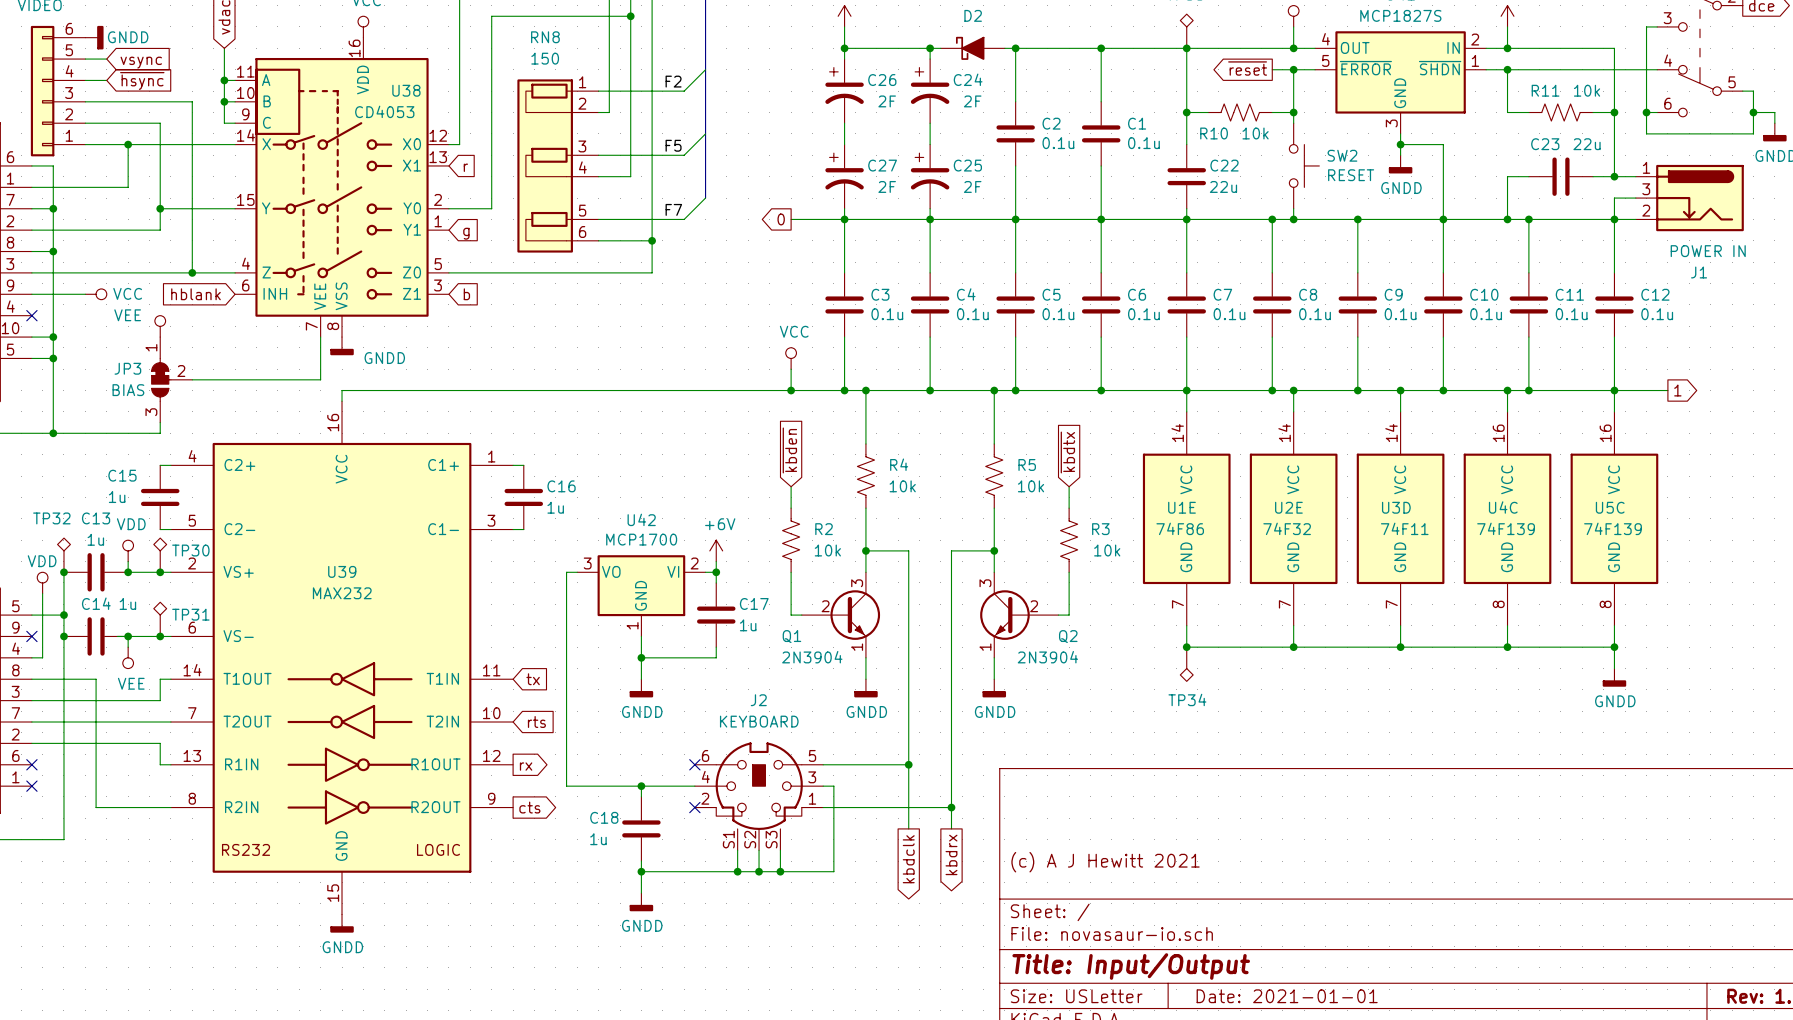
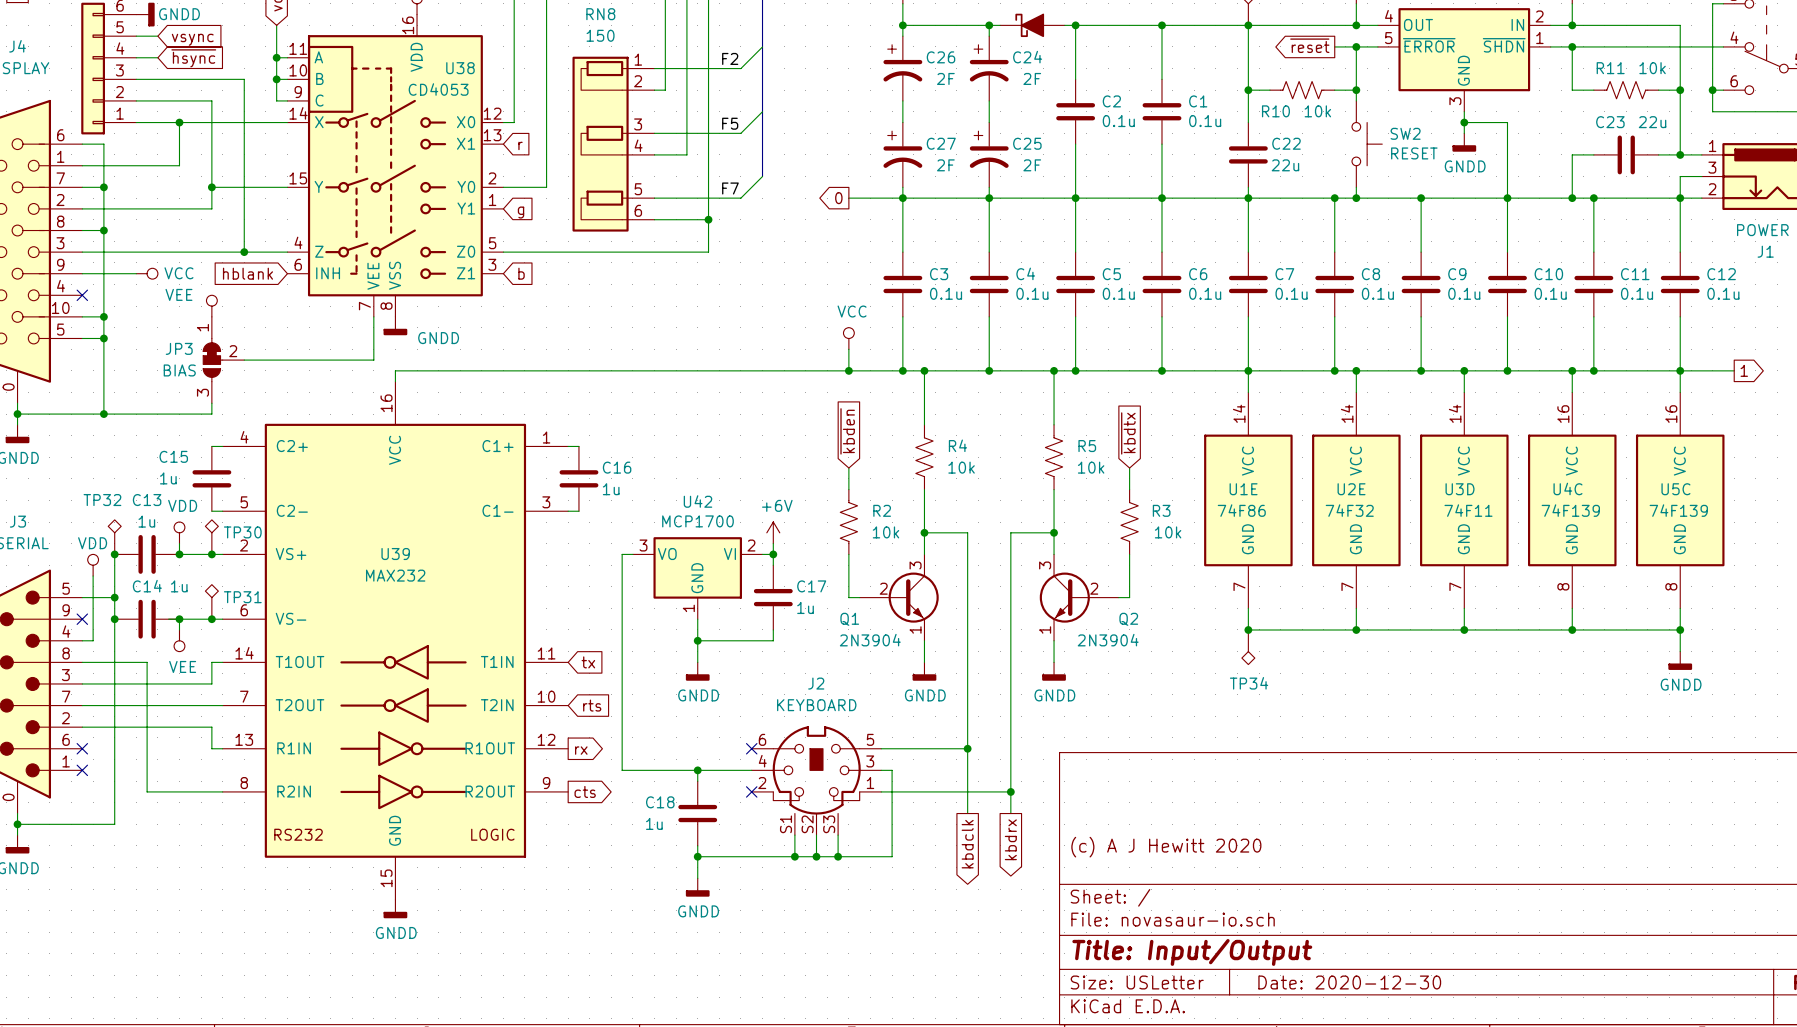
title block: (c) A J Hewitt 2021 (1105, 862) -> (c) A J Hewitt 2020 (1166, 847)
title block: Date: 2021-01-01 (1287, 996) -> Date: 2020-12-30 (1349, 982)

